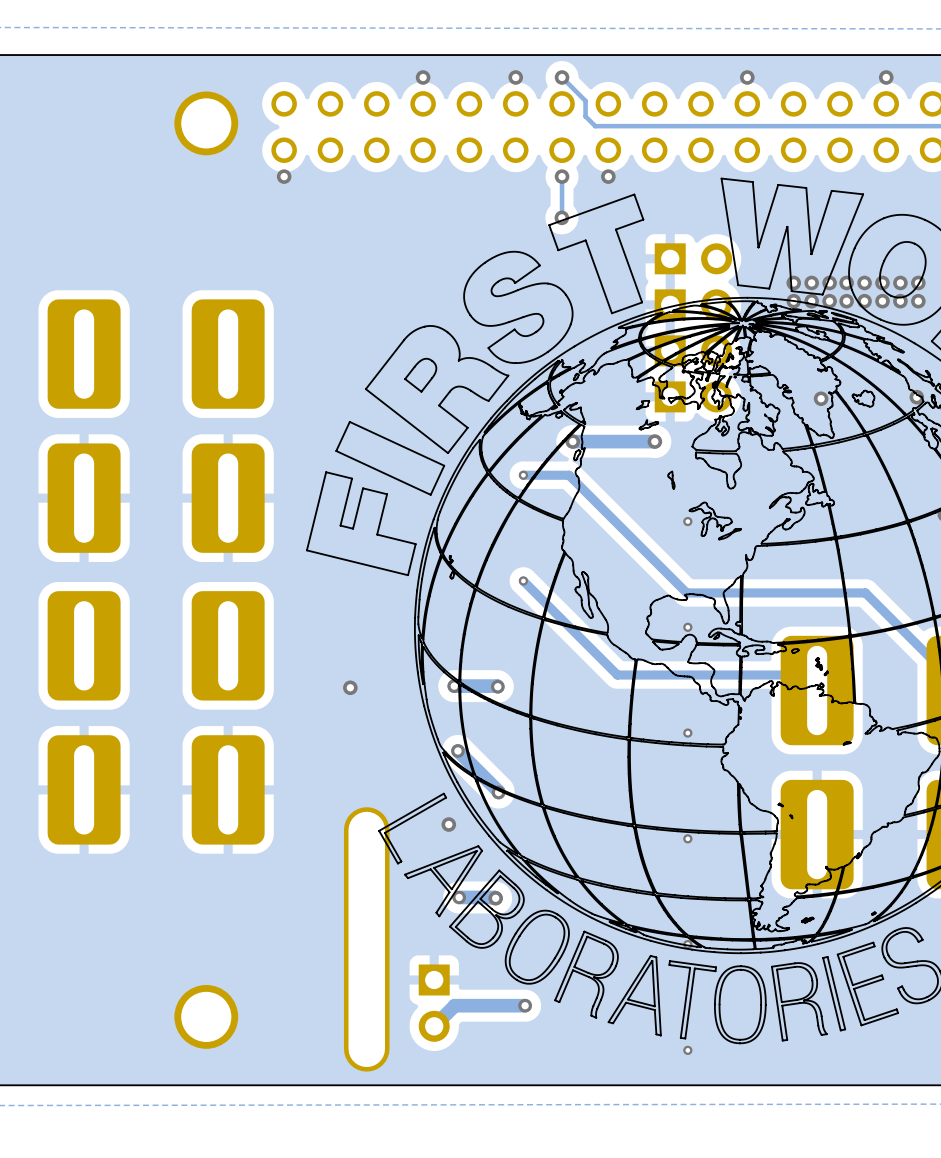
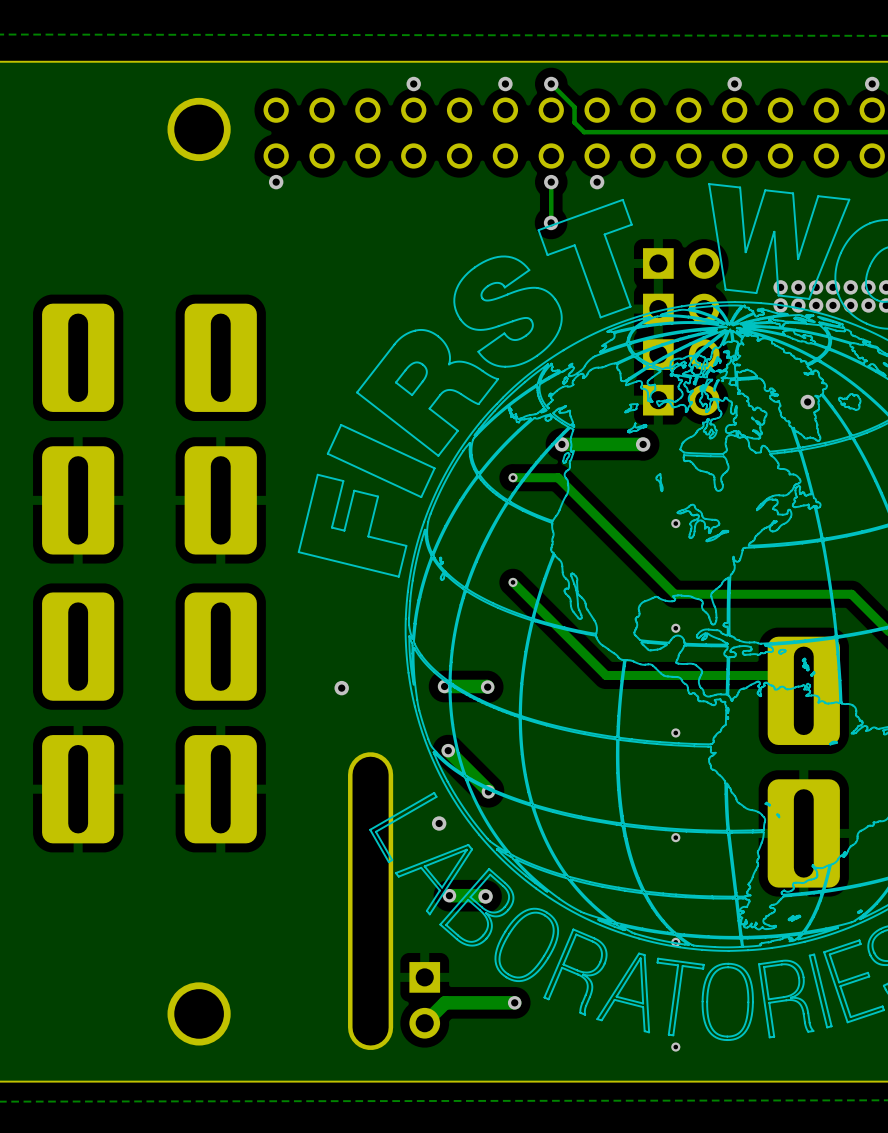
part: none -> (370, 901)
part: (366, 939) -> none

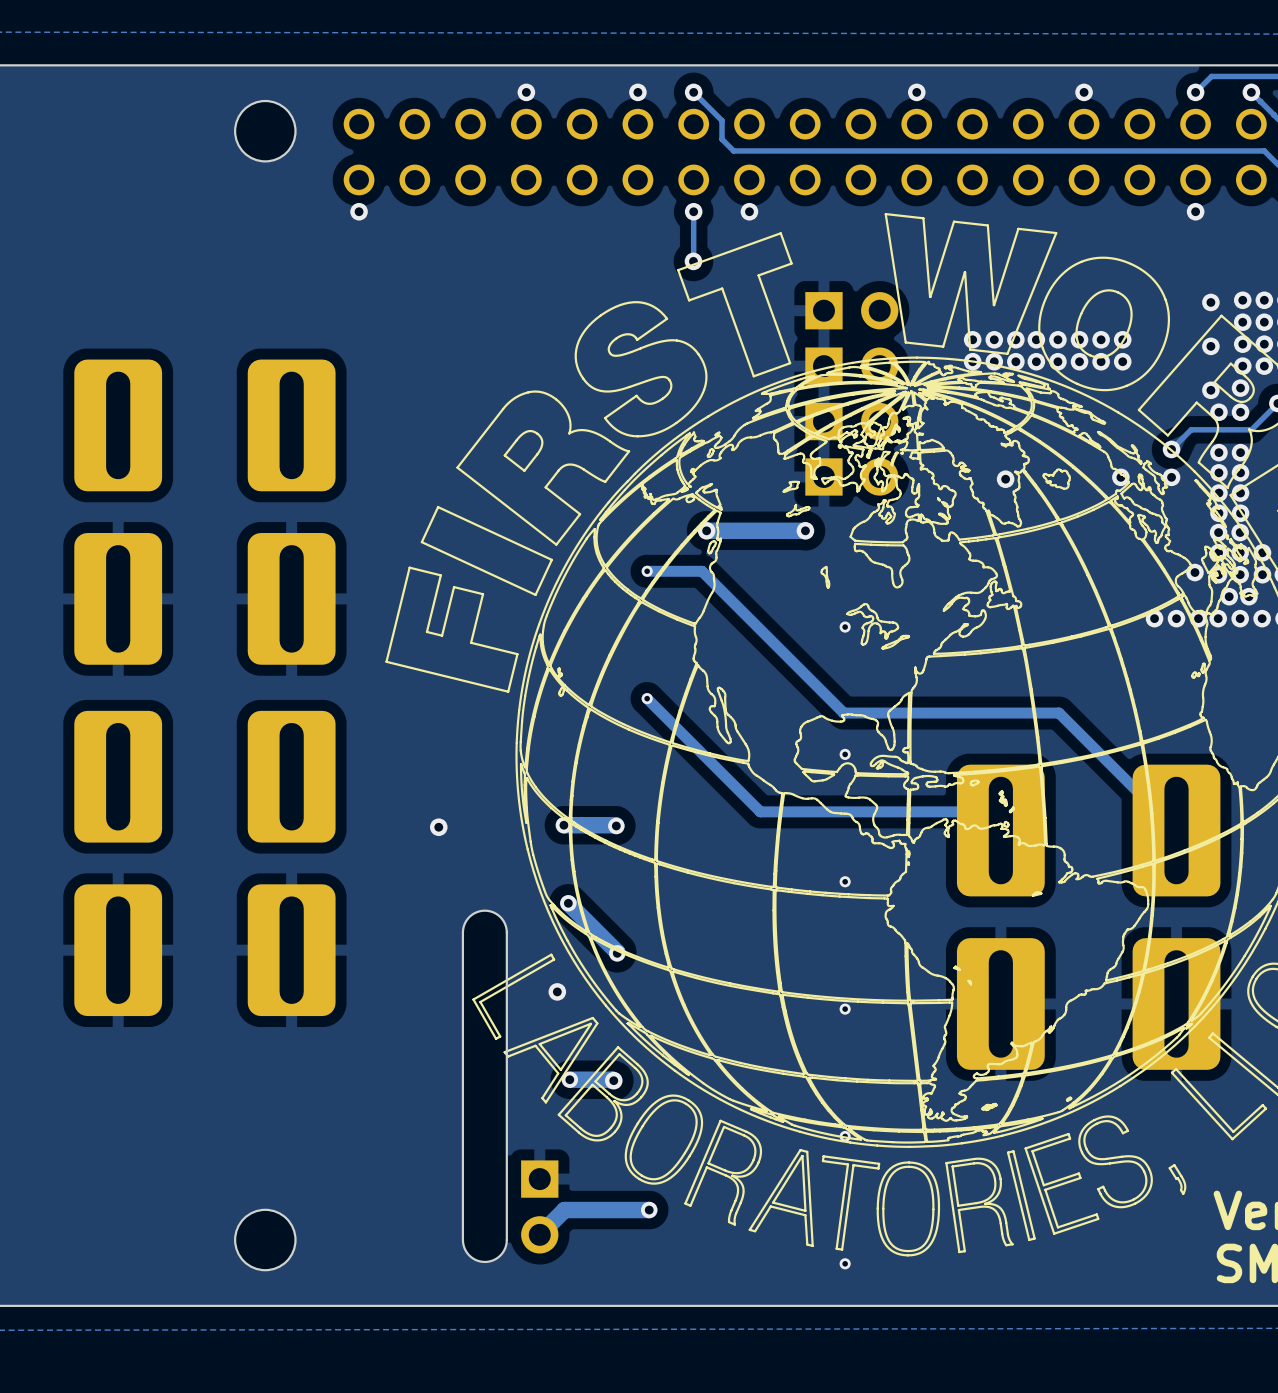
round board edge: none -> [234, 99, 297, 163]
part: (199, 129) -> none
board edge: none -> (506, 932) (506, 1242) (503, 1250) (498, 1257) (490, 1261) (482, 1261) (473, 1259) (467, 1253) (462, 1240) (463, 929) (469, 917) (476, 912) (484, 910) (493, 912) (500, 917) (505, 924) (506, 932)
part: (370, 901) -> none
round board edge: none -> [234, 1208, 297, 1272]
part: (199, 1013) -> none

